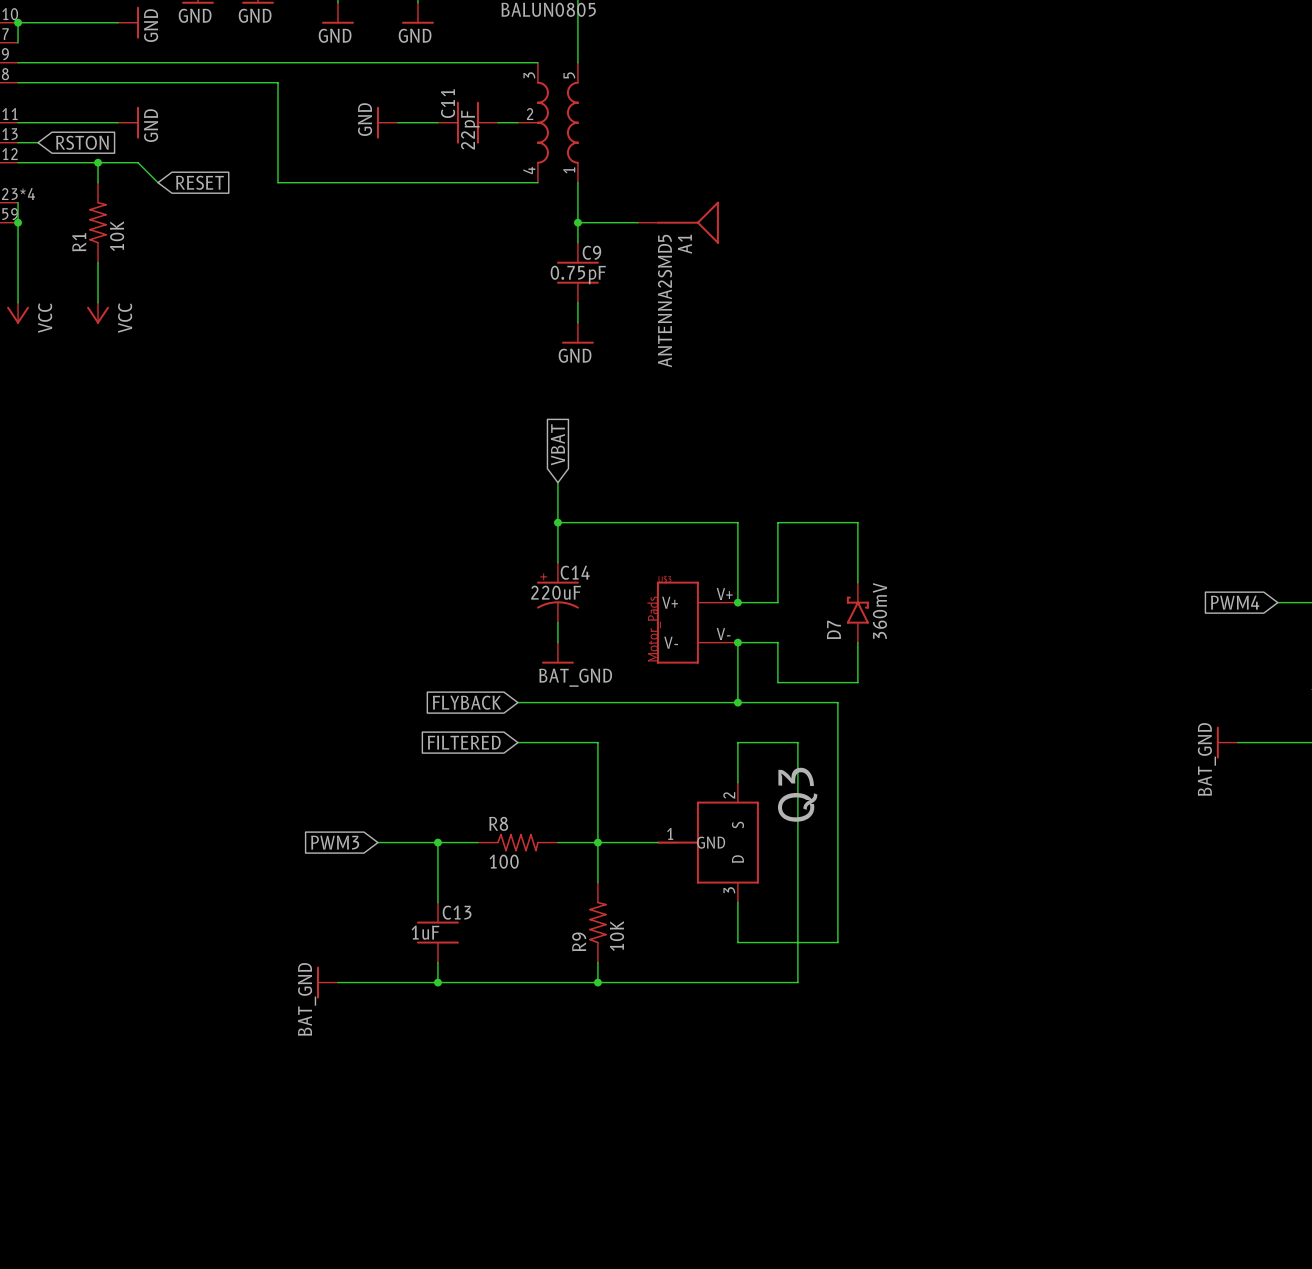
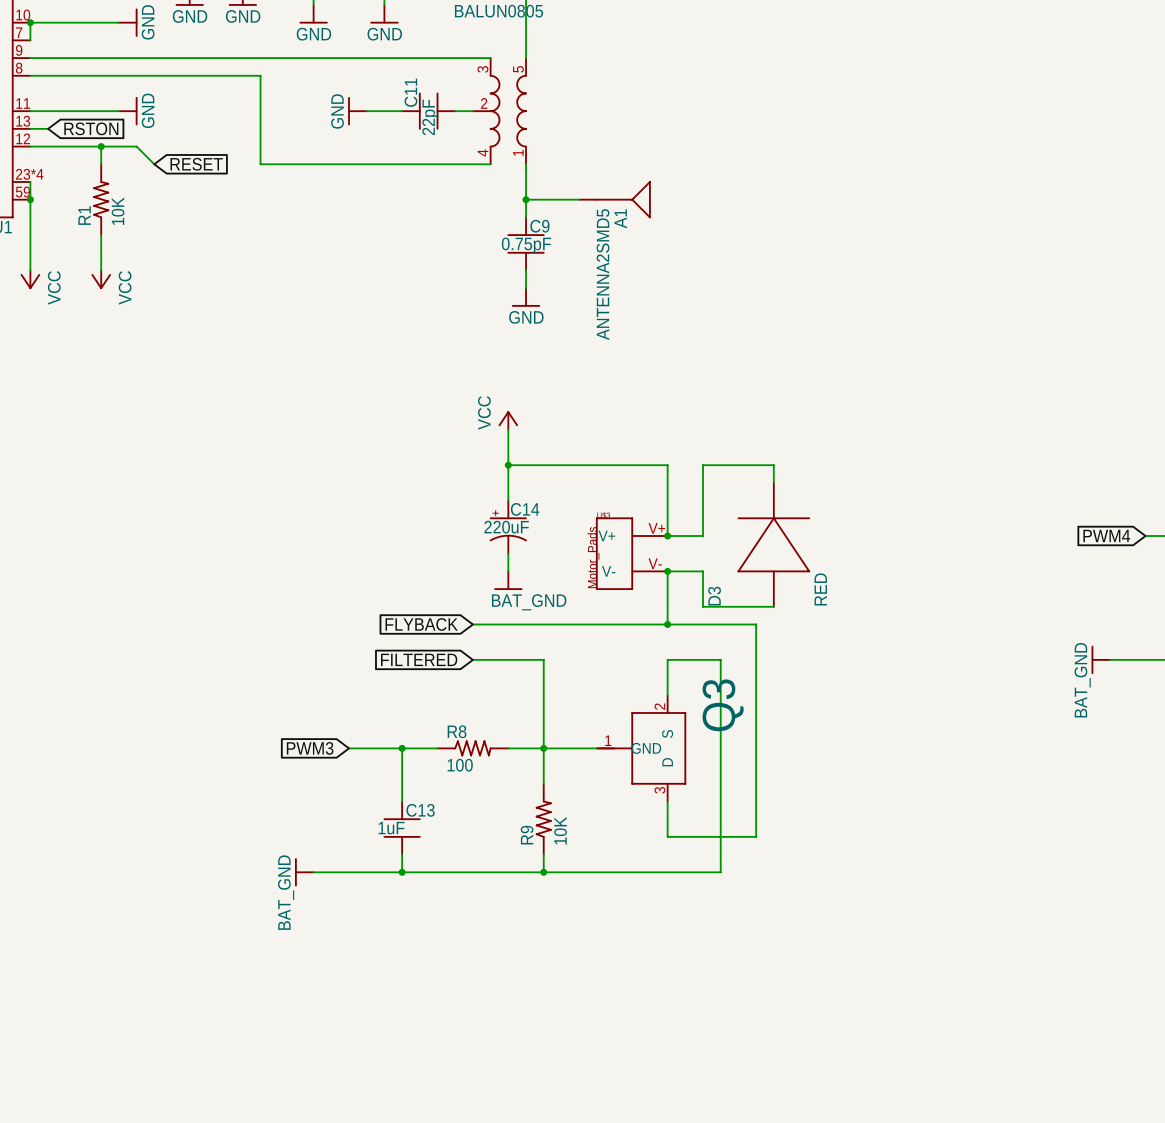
global label: VBAT (558, 444) -> none
power symbol: none -> VCC (508, 420)
D7: 360mV (857, 612) -> none
D3: none -> RED (773, 544)

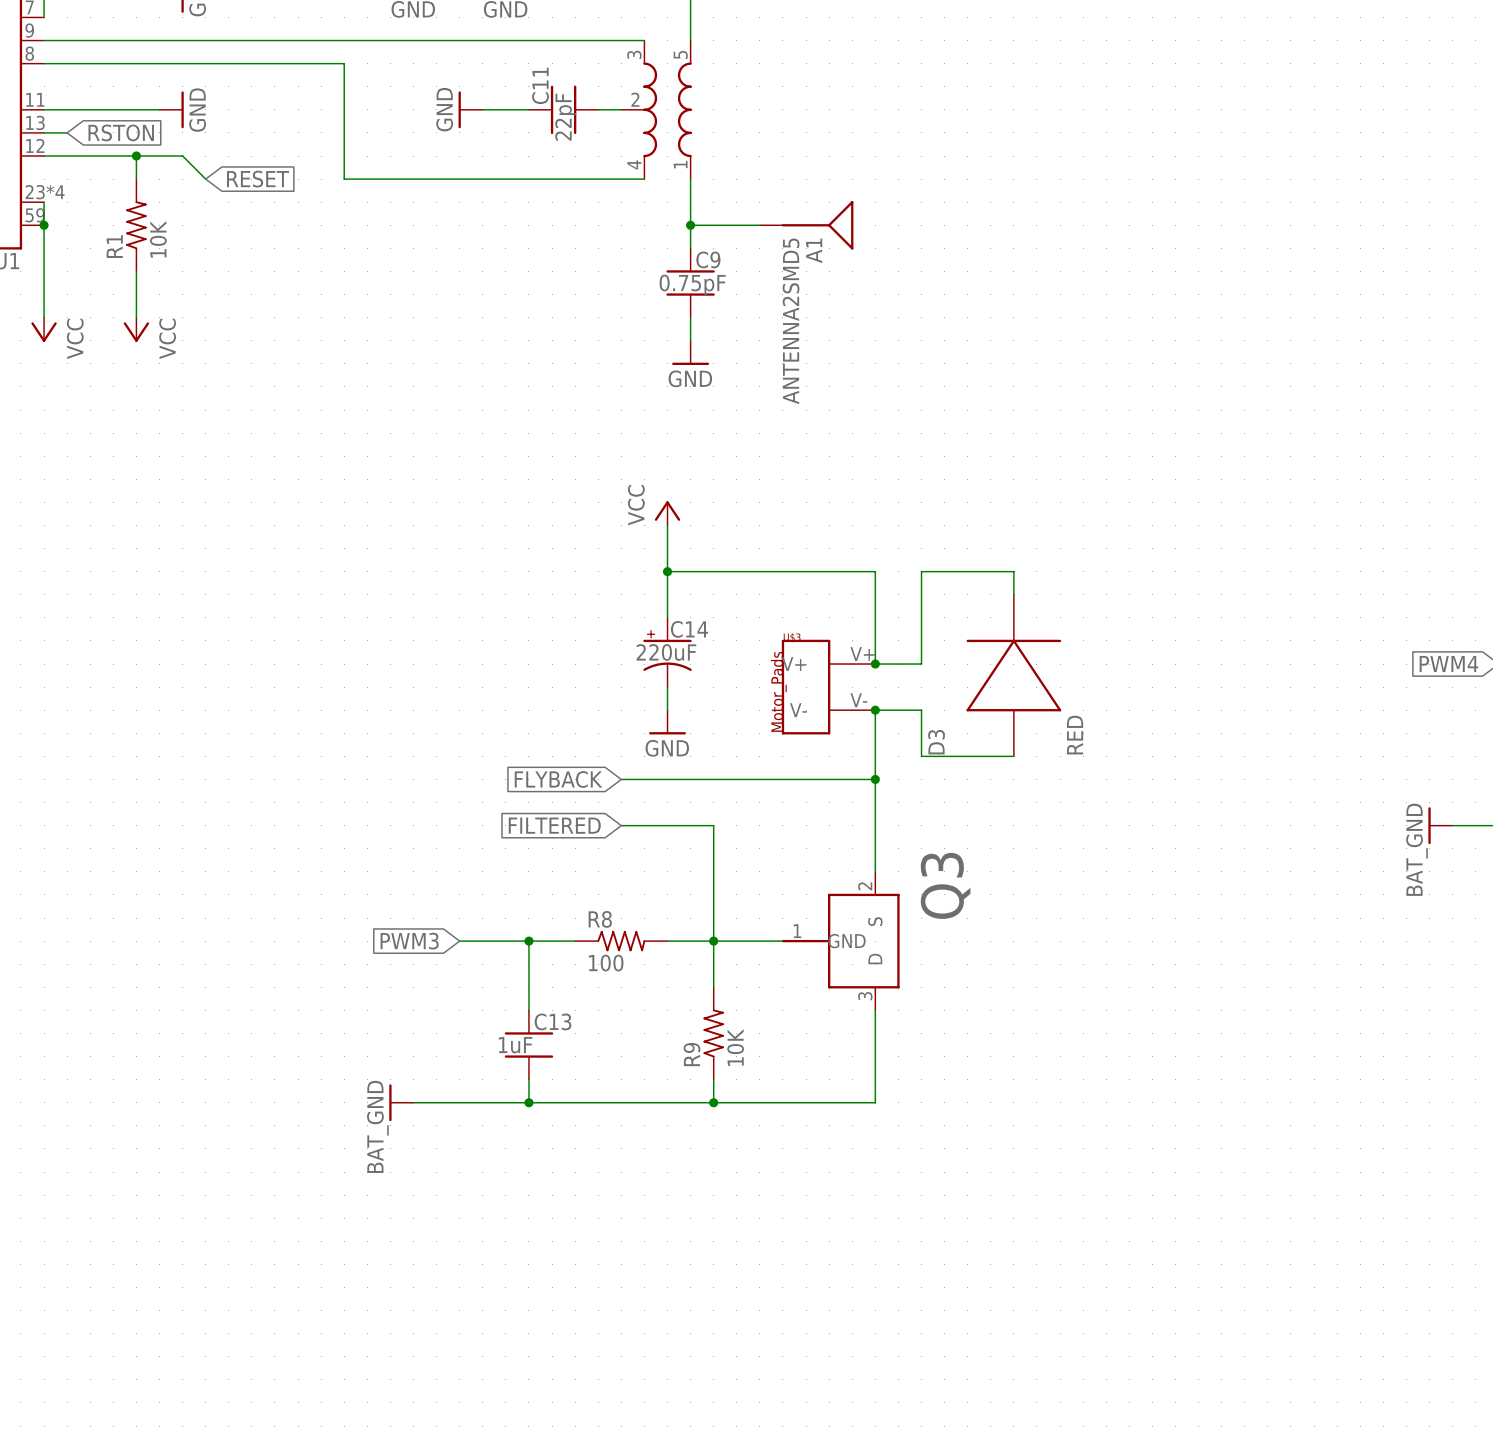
power symbol: BAT_GND (508, 580) -> GND (667, 722)
wire: (667, 624) (756, 624) (756, 836) (667, 836) -> (875, 779) (875, 825)
wire: (667, 659) (720, 659) (720, 872) (667, 872) -> (875, 1056) (875, 1102)

